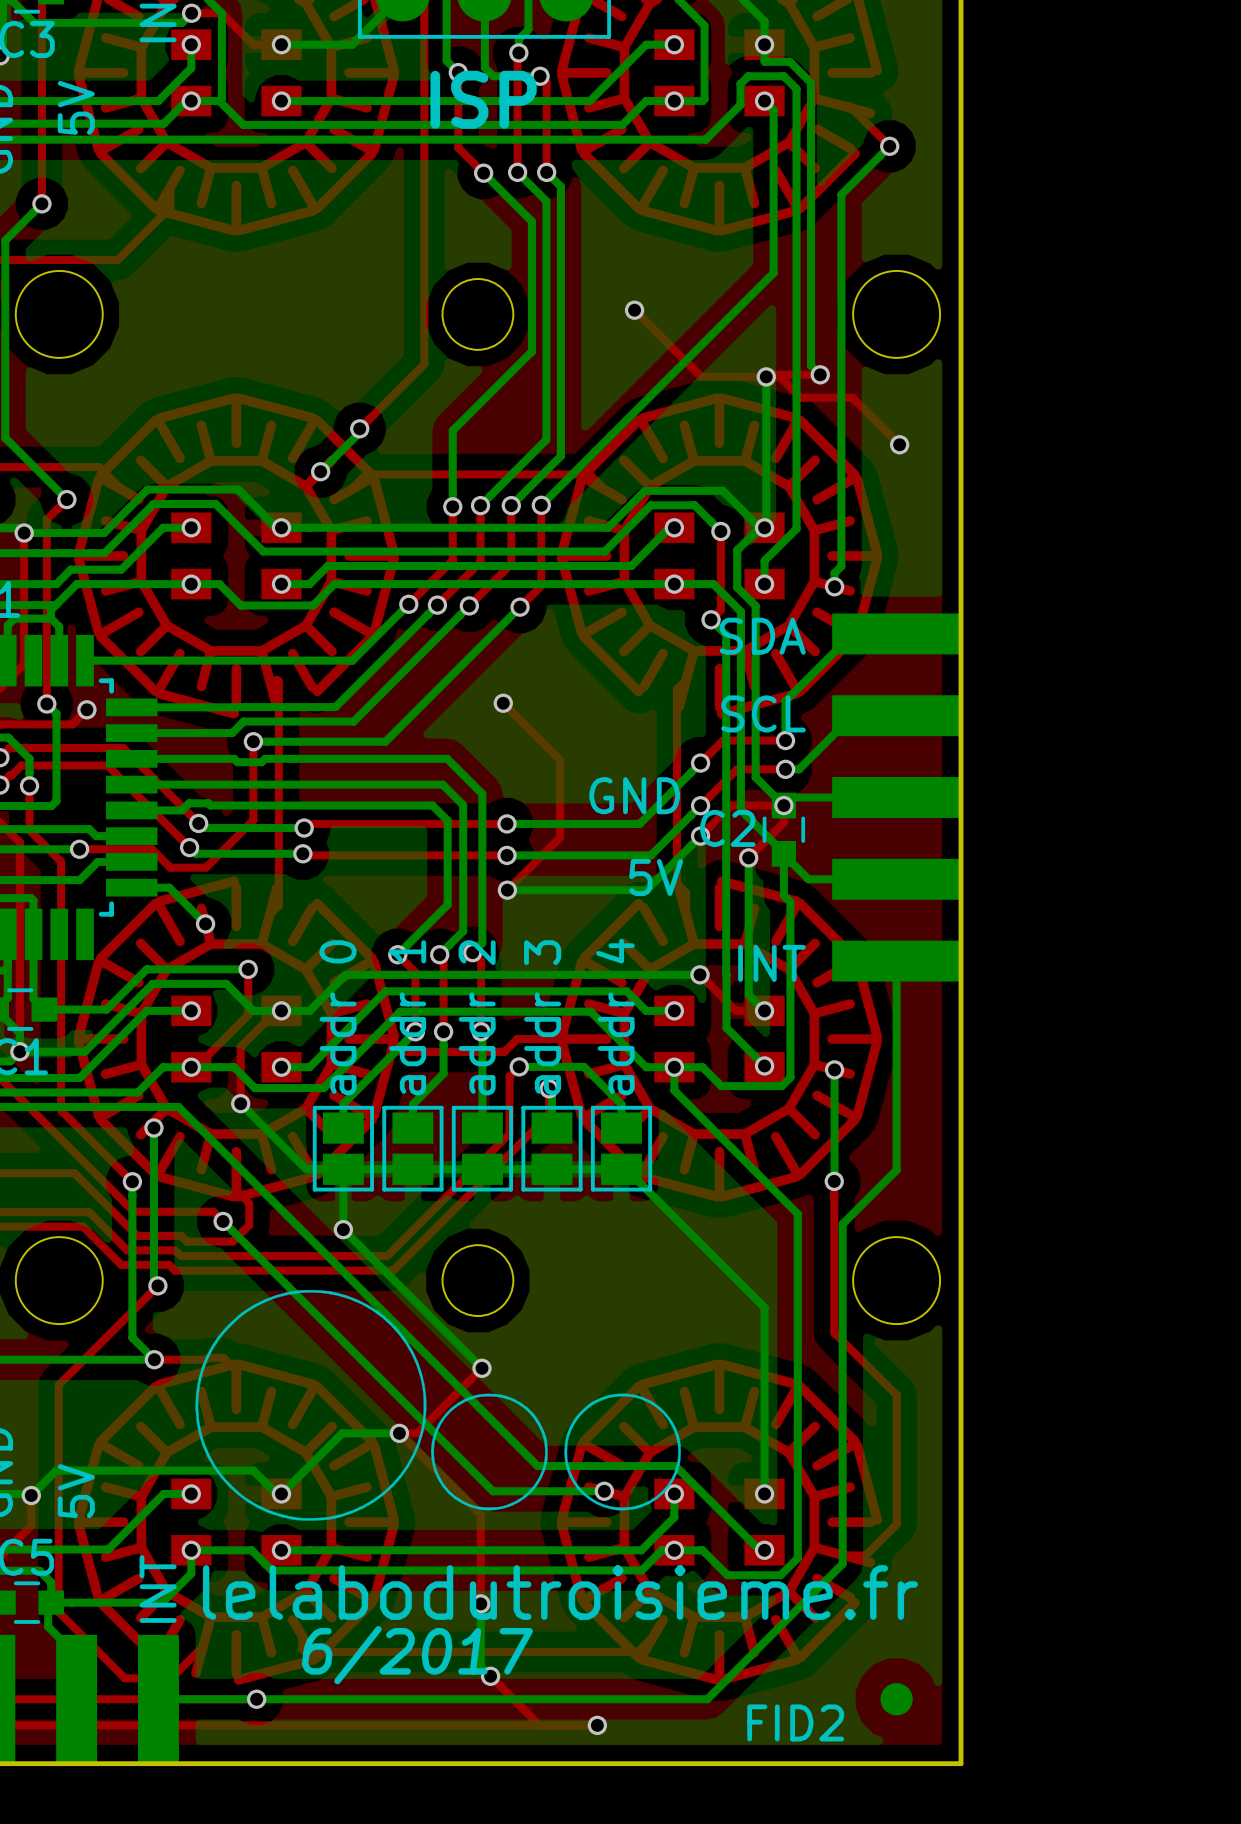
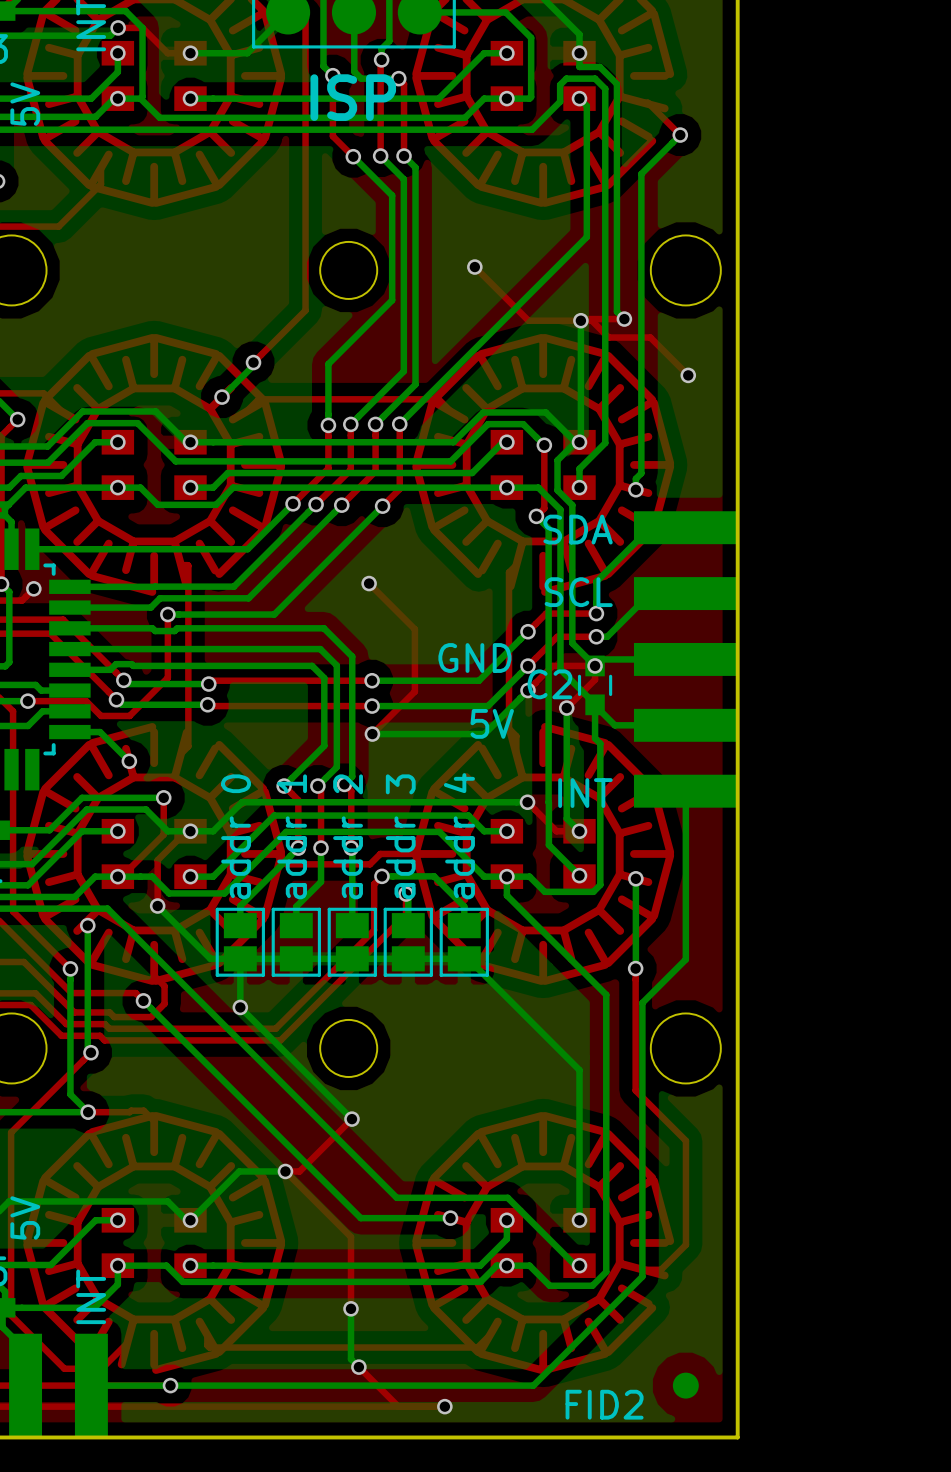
drawing: [195, 1289, 681, 1521] -> none
text: lelabodutroisieme.fr (560, 1592) -> none
text: 6/2017 (417, 1655) -> none

